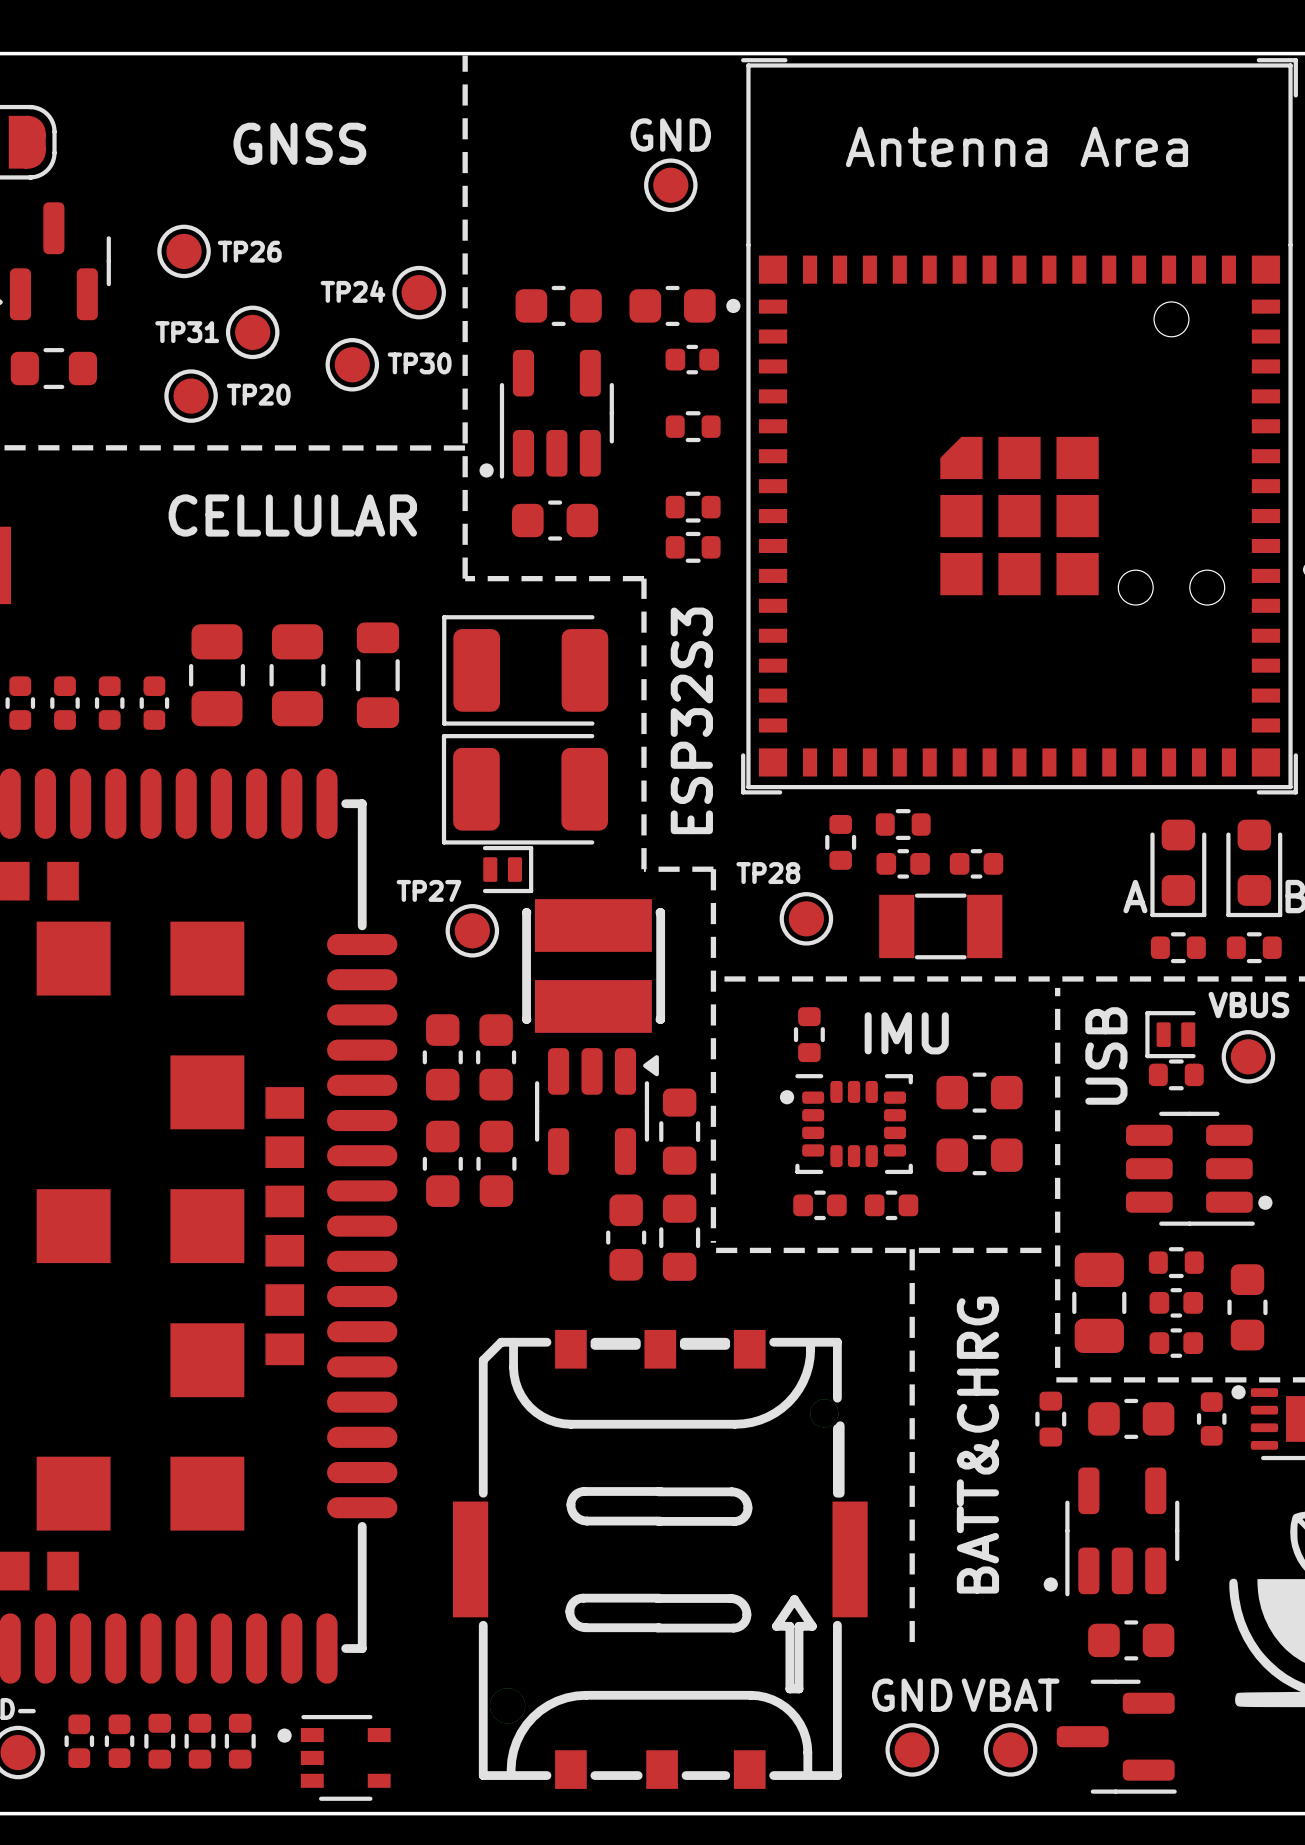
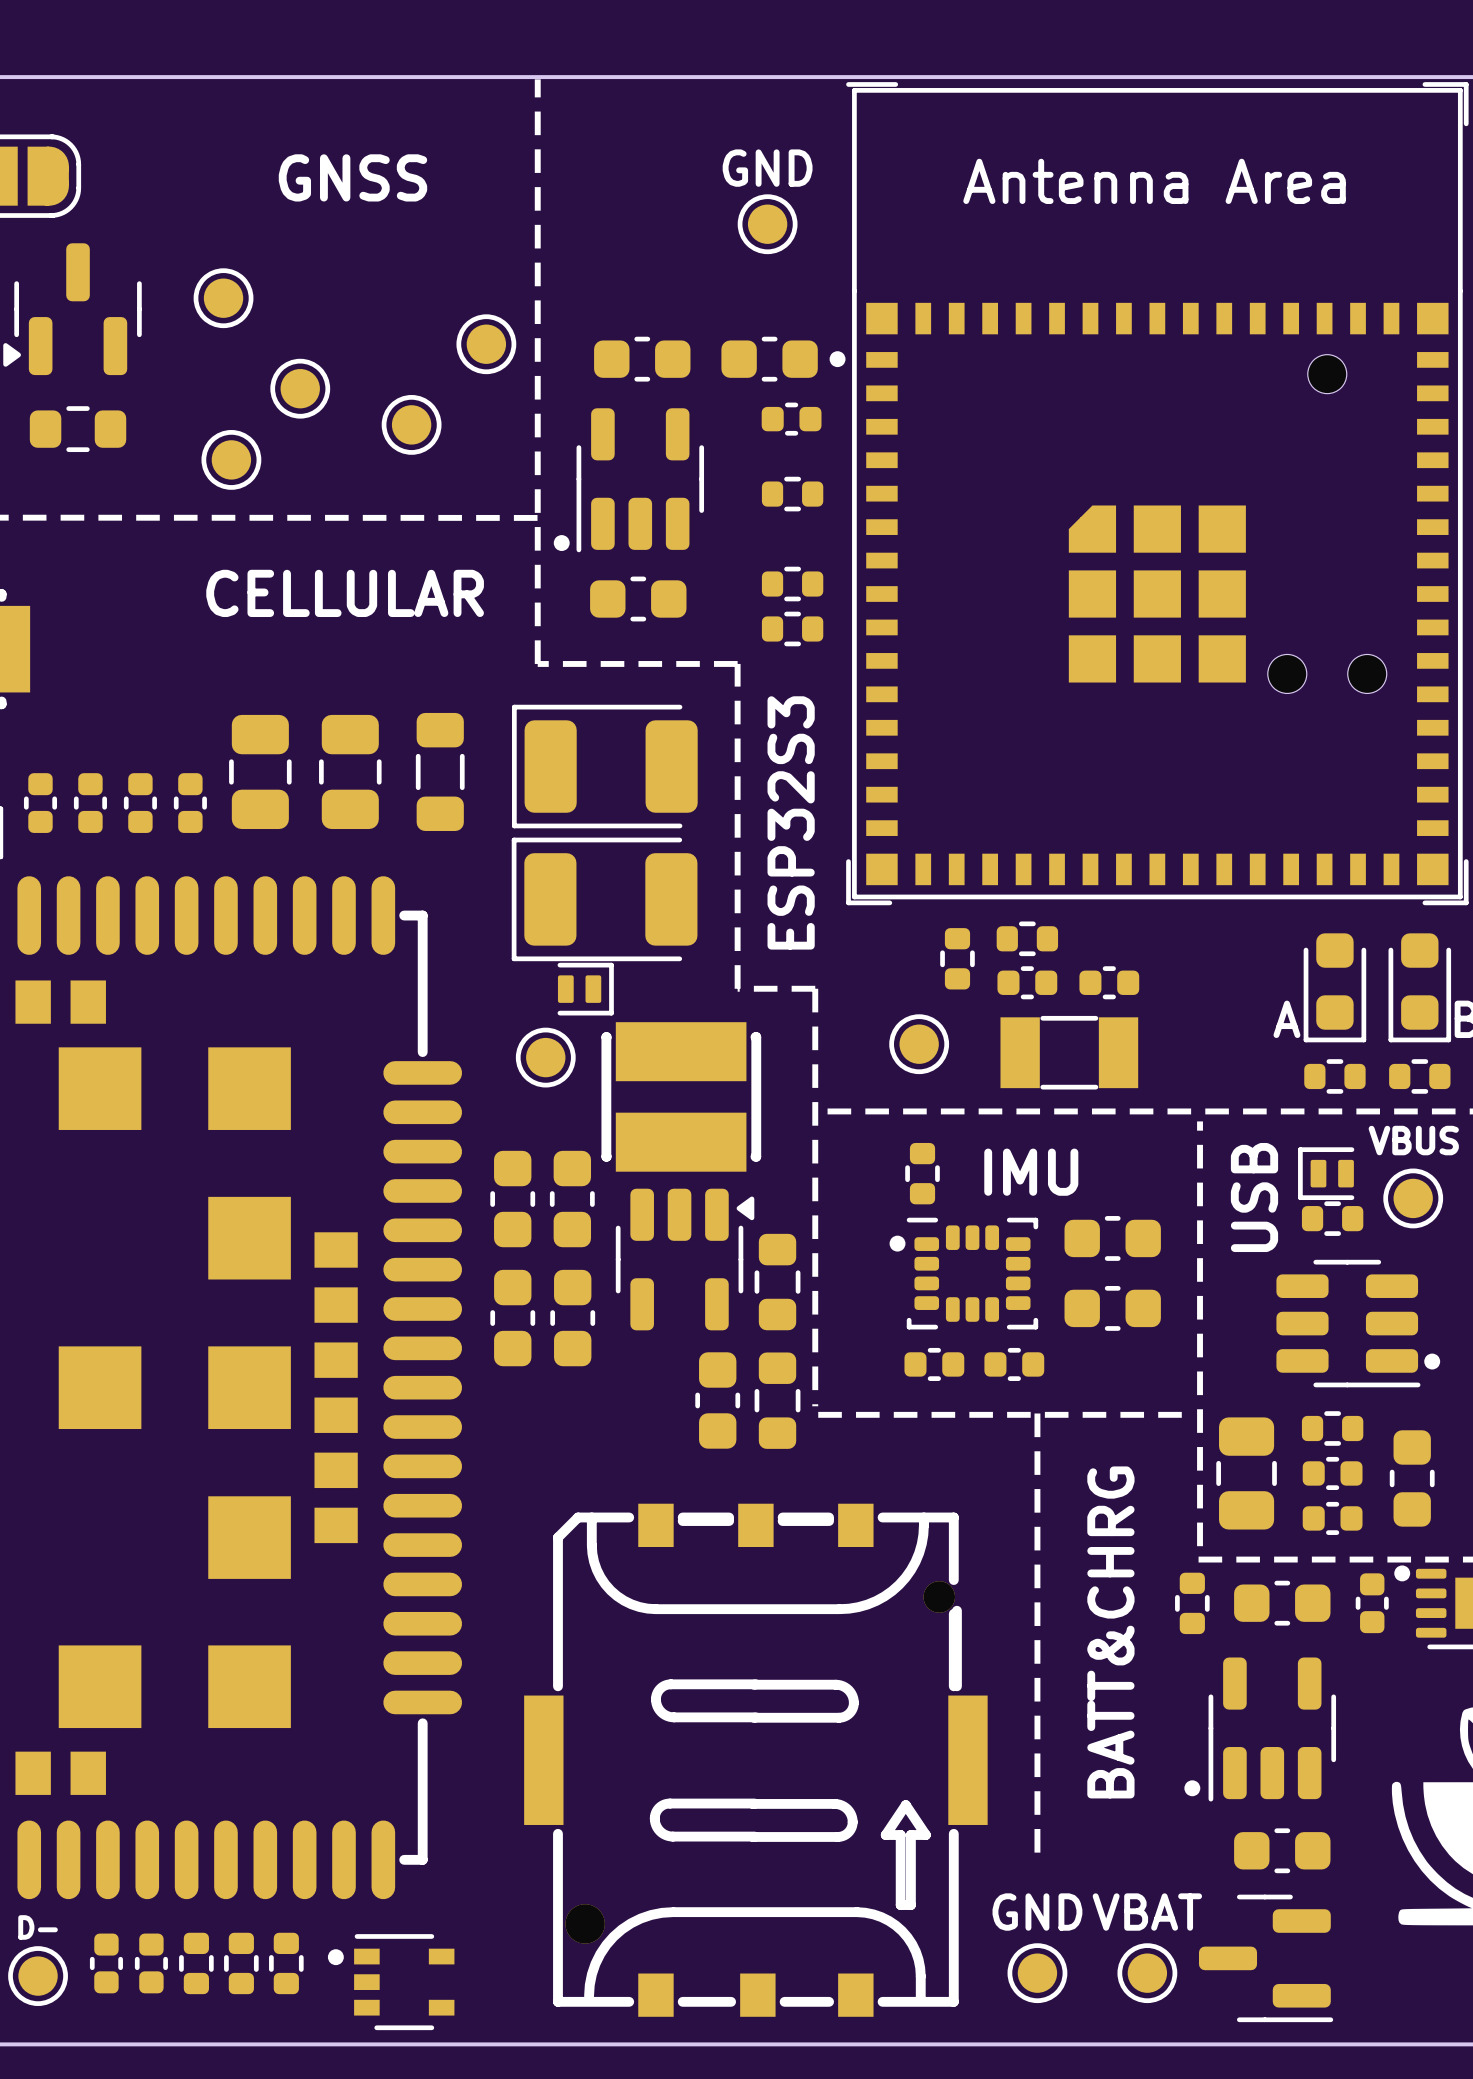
TP26 name: TP26 (249, 251) -> none
TP24 name: TP24 (352, 291) -> none
TP31 name: TP31 (187, 332) -> none
TP30 name: TP30 (419, 363) -> none
TP20 name: TP20 (258, 394) -> none
TP28 name: TP28 (768, 873) -> none
TP27 name: TP27 (428, 890) -> none

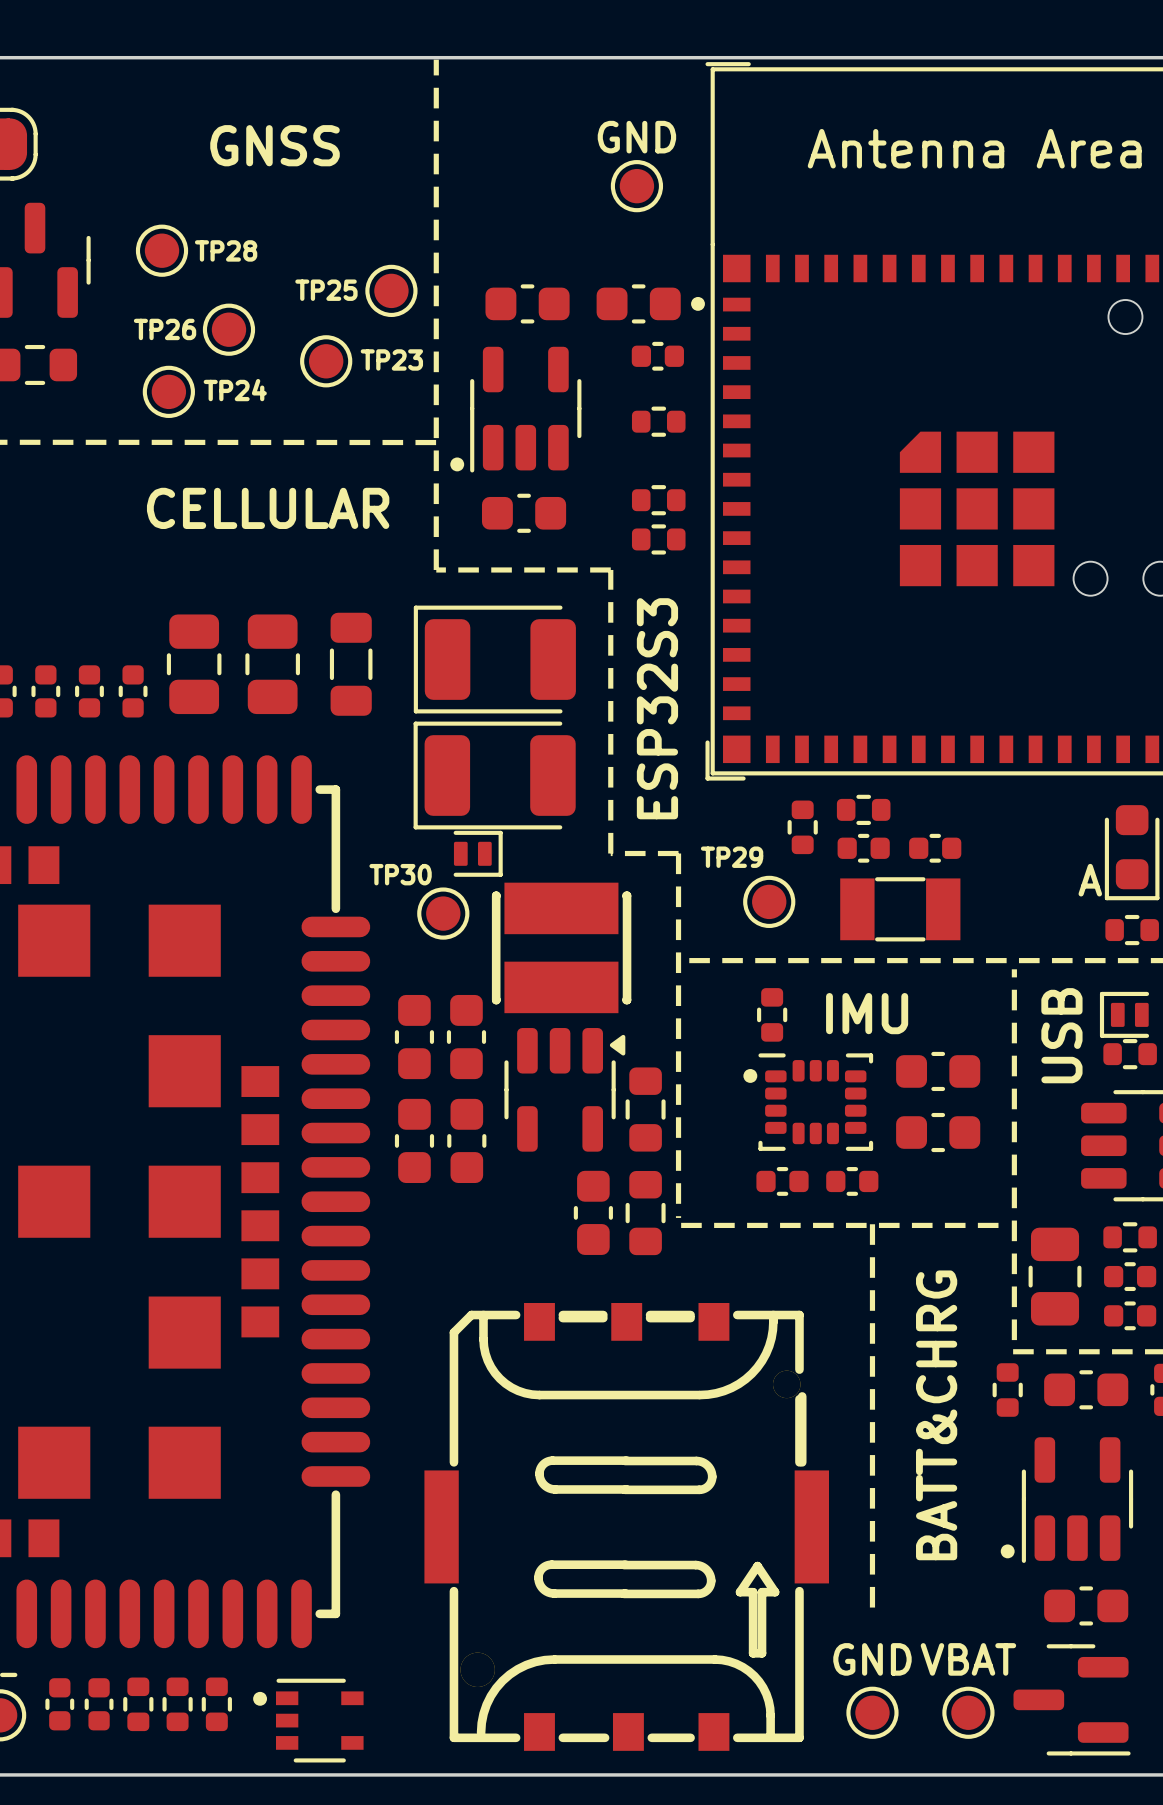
TP28 name: none -> TP28 (226, 250)
TP25 name: none -> TP25 (326, 290)
TP26 name: none -> TP26 (165, 329)
TP23 name: none -> TP23 (391, 359)
TP24 name: none -> TP24 (235, 390)
TP29 name: none -> TP29 (732, 857)
TP30 name: none -> TP30 (400, 874)

